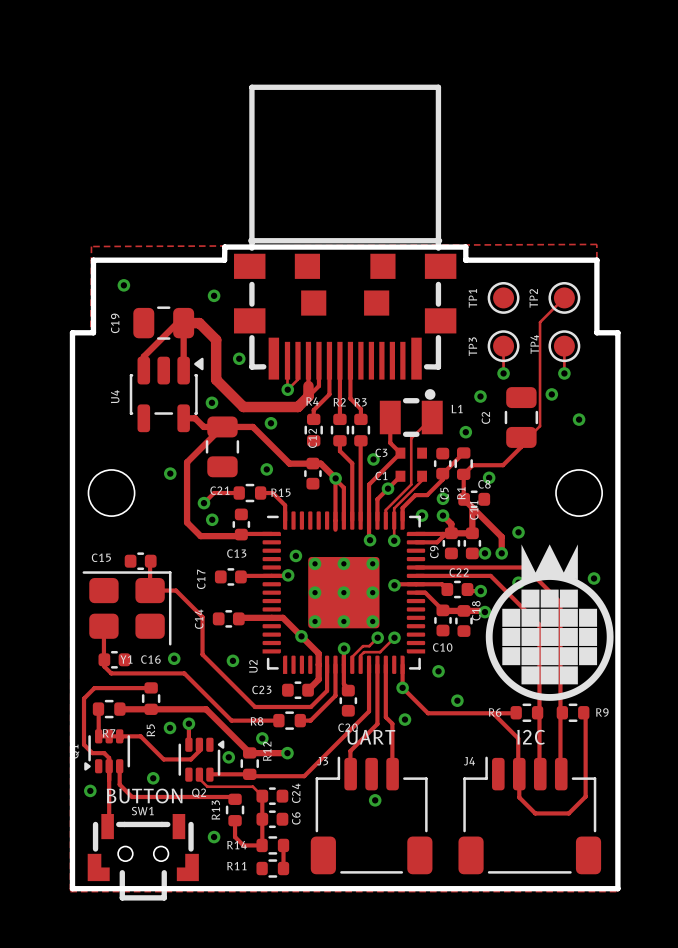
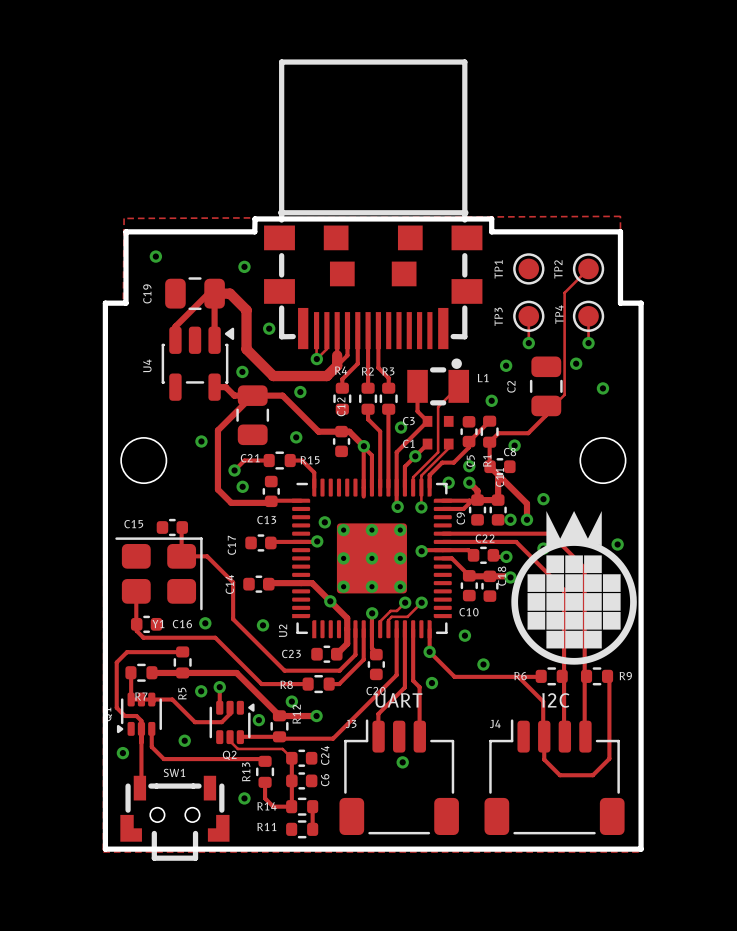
text: BUTTON (144, 796) -> none

